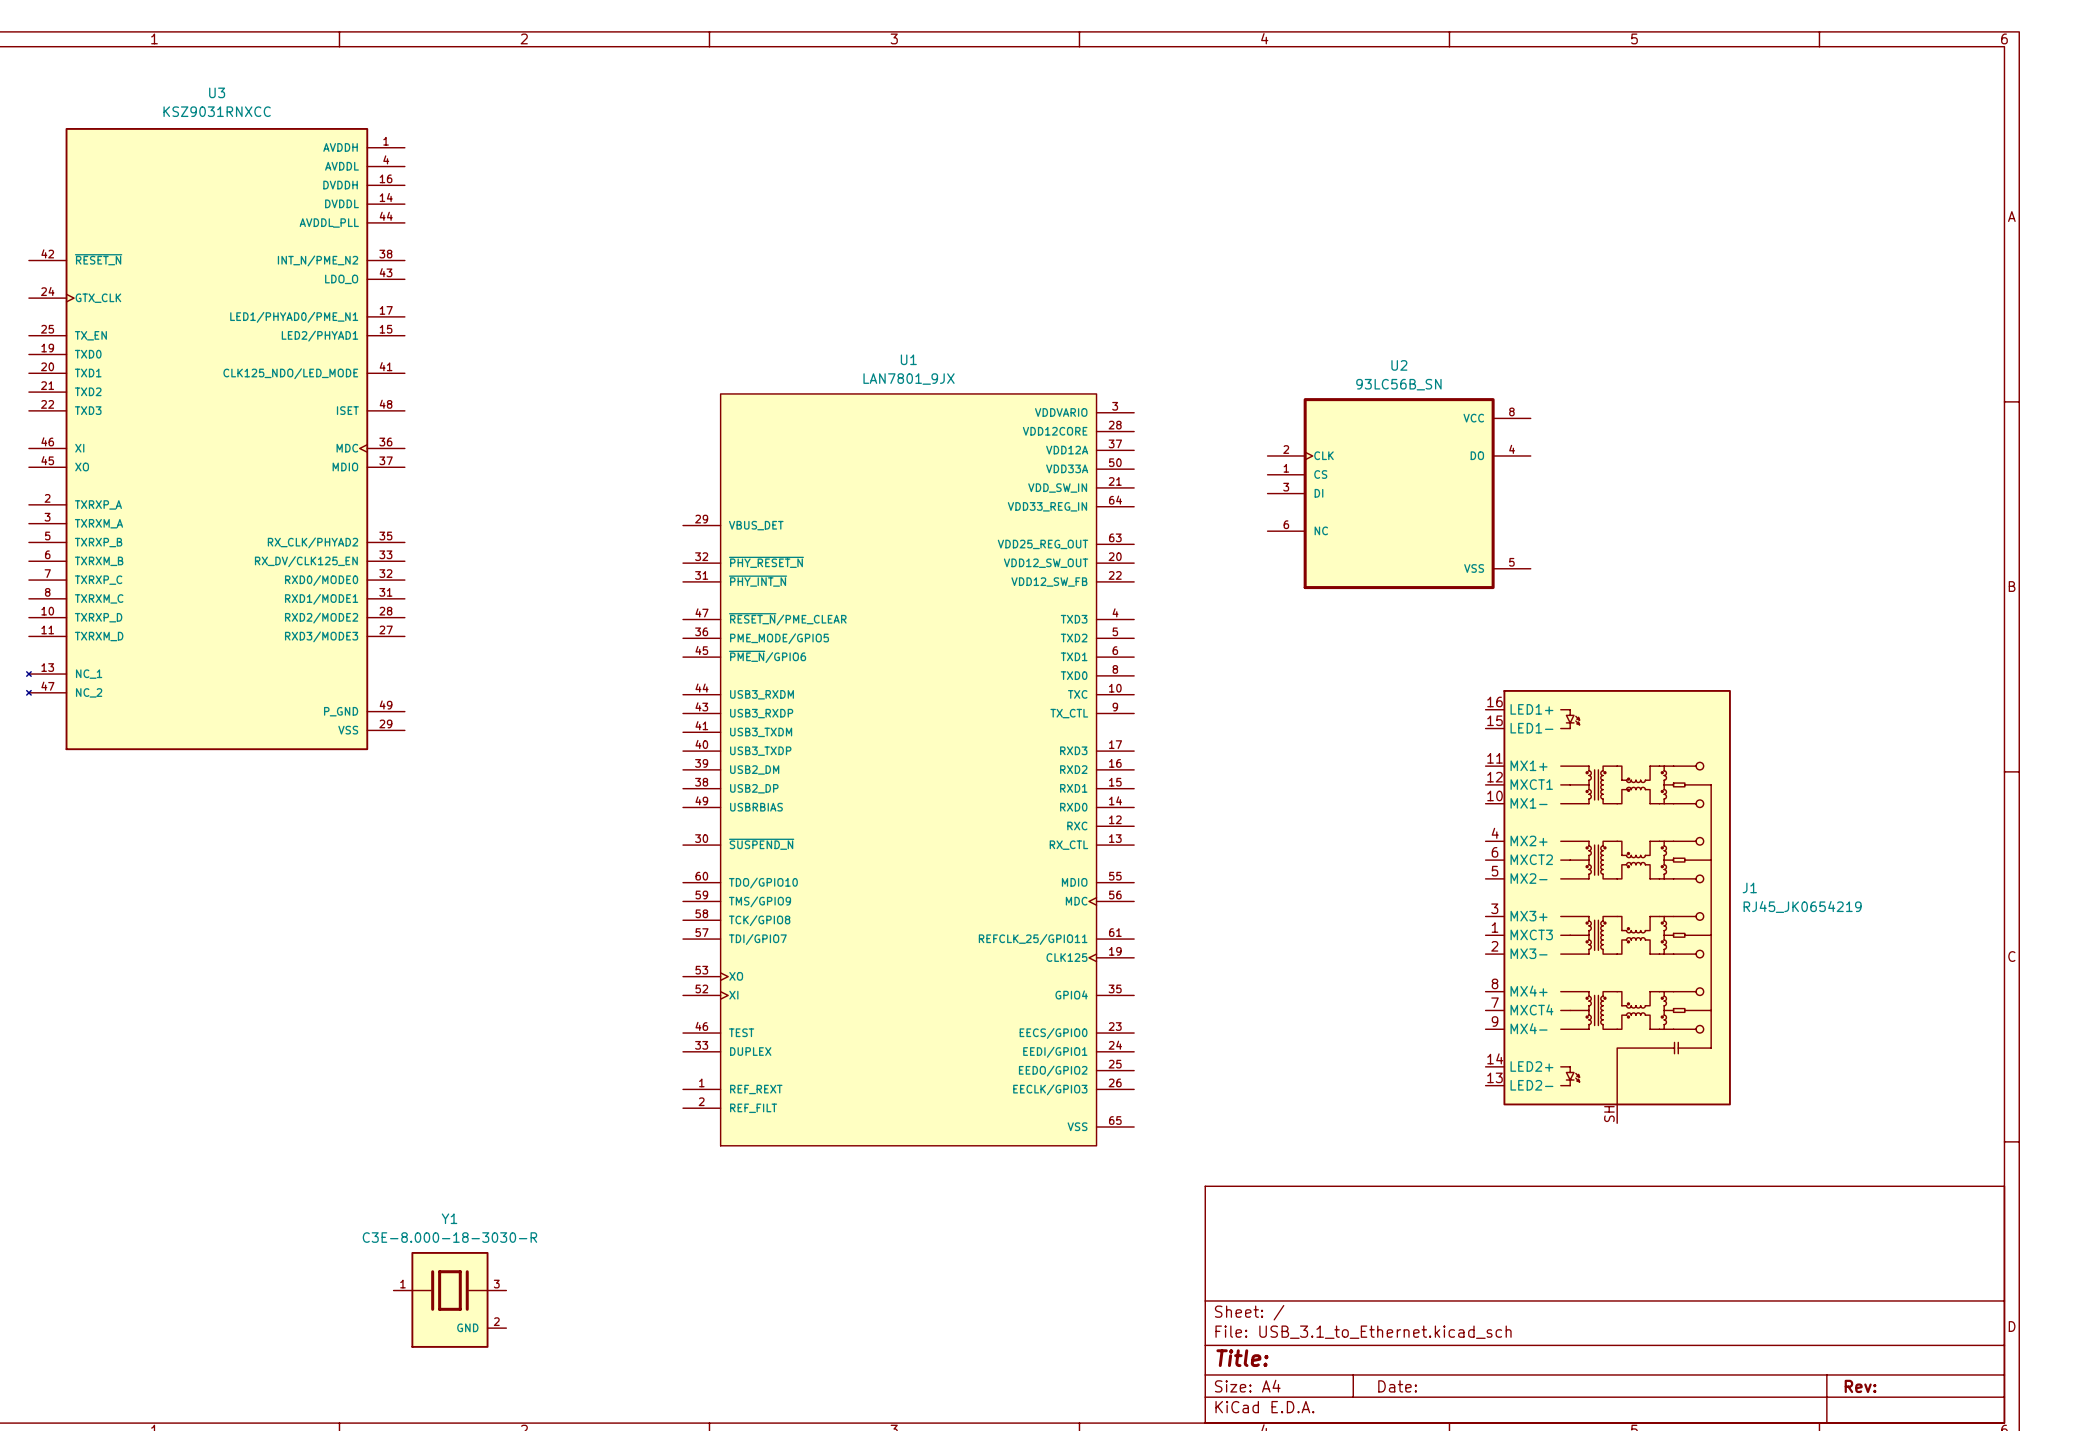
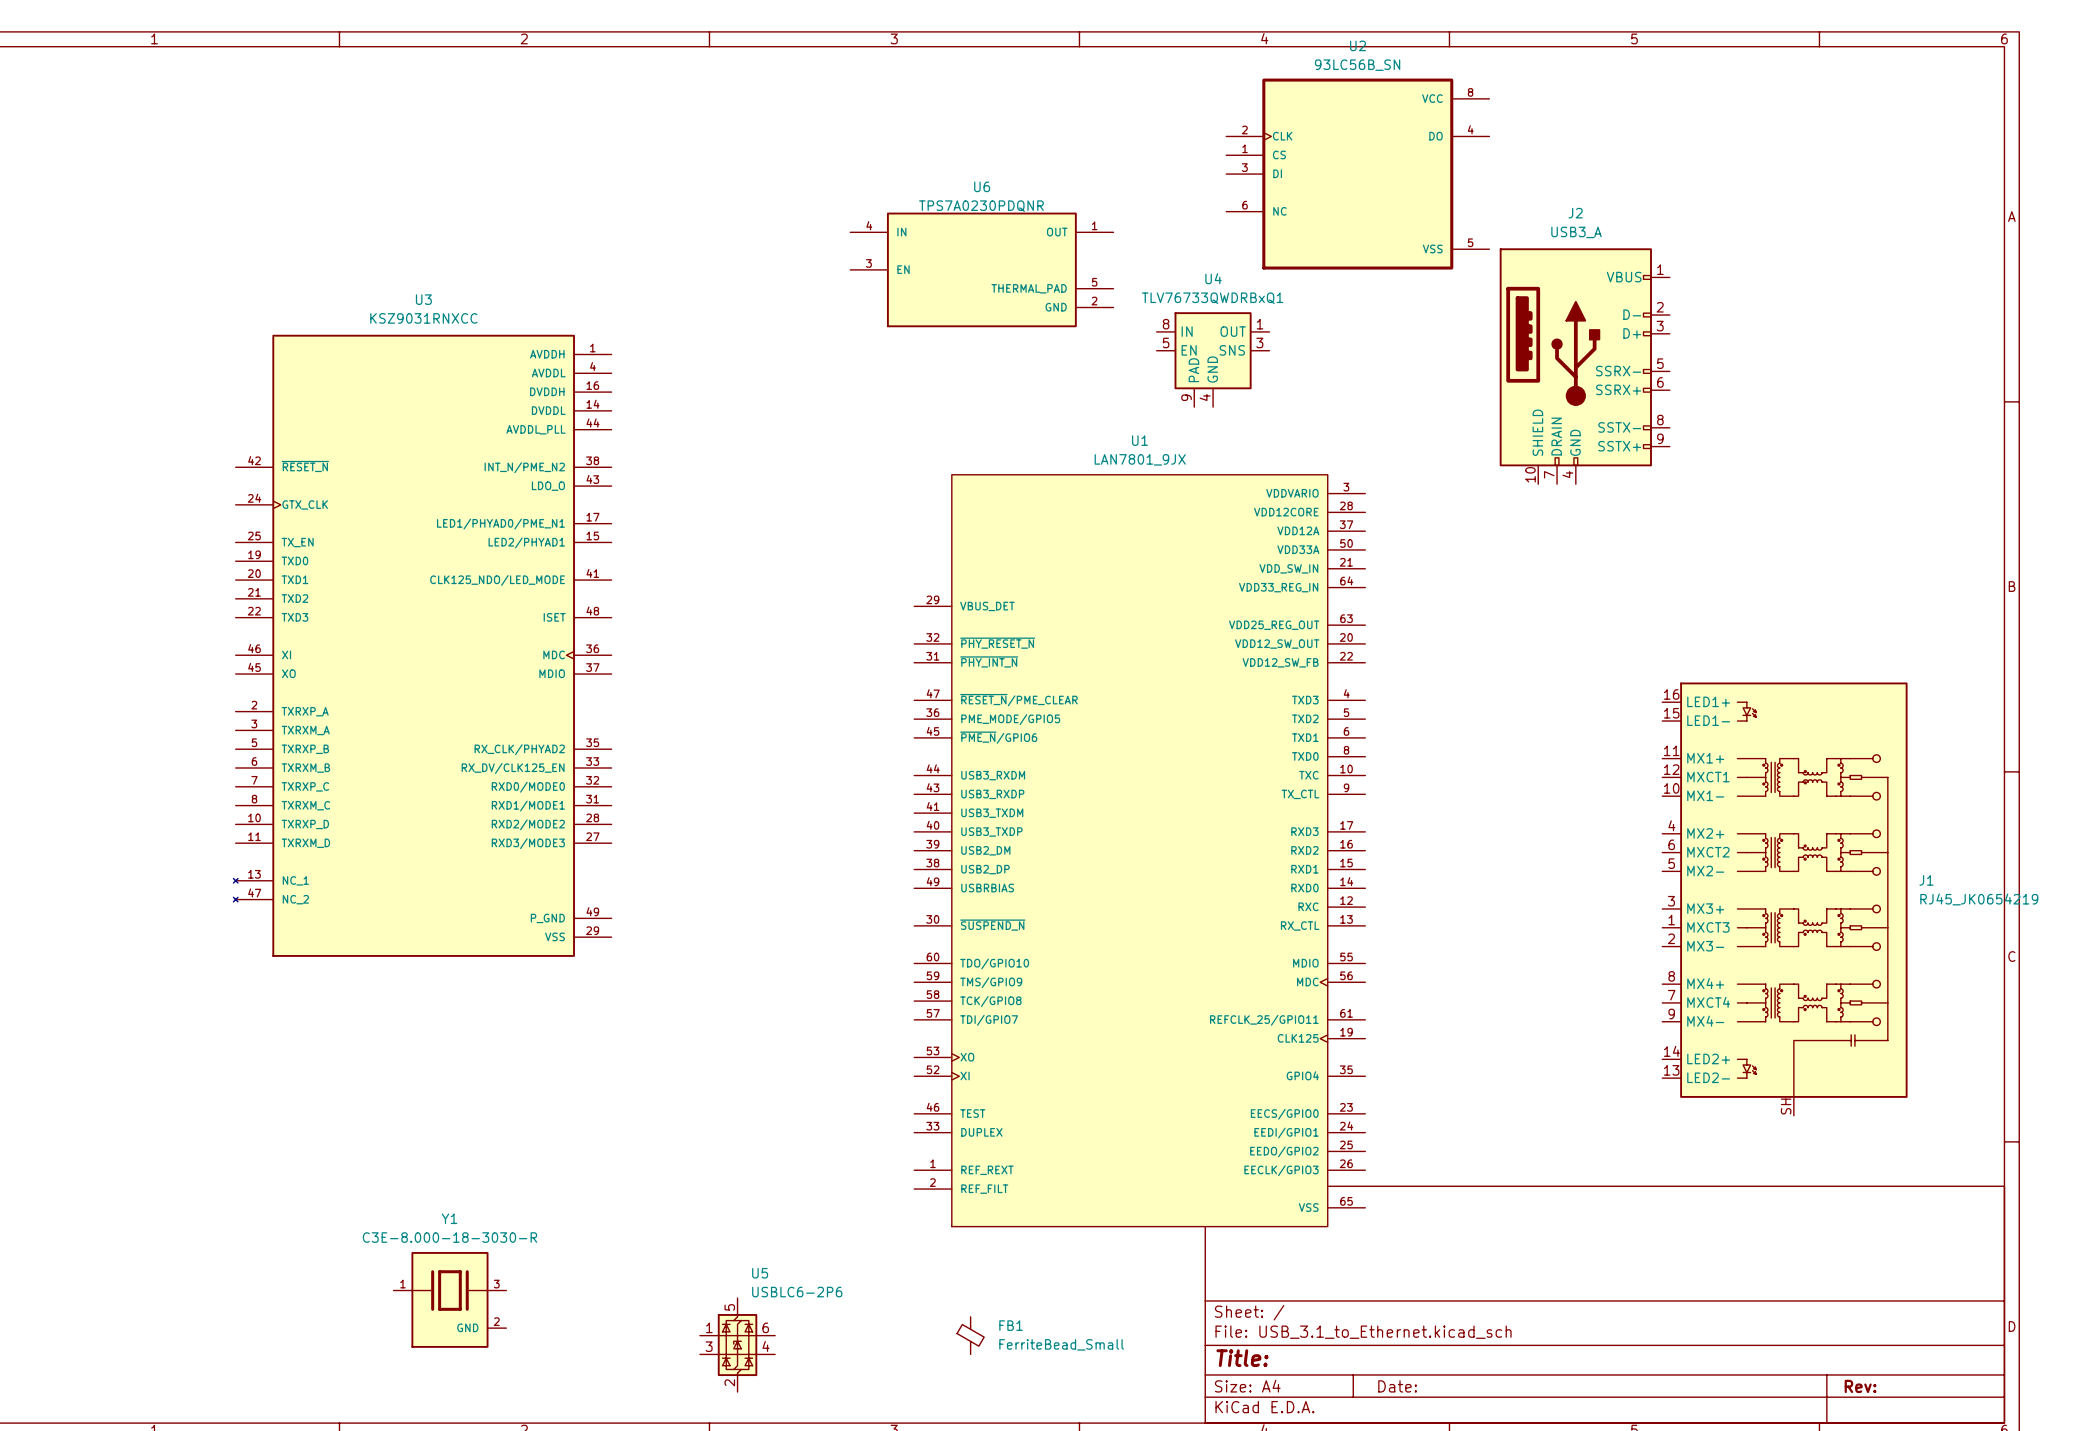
U6: none -> TPS7A0230PDQNR (981, 269)
U4: none -> TLV76733QWDRBxQ1 (1213, 359)
J2: none -> USB3_A (1584, 366)
U3 position: (215, 439) -> (422, 645)
U2 position: (1399, 493) -> (1357, 174)
U1 position: (908, 769) -> (1139, 850)
J1 position: (1608, 906) -> (1784, 899)
FB1: none -> FerriteBead_Small (970, 1335)
U5: none -> USBLC6-2P6 (737, 1345)

